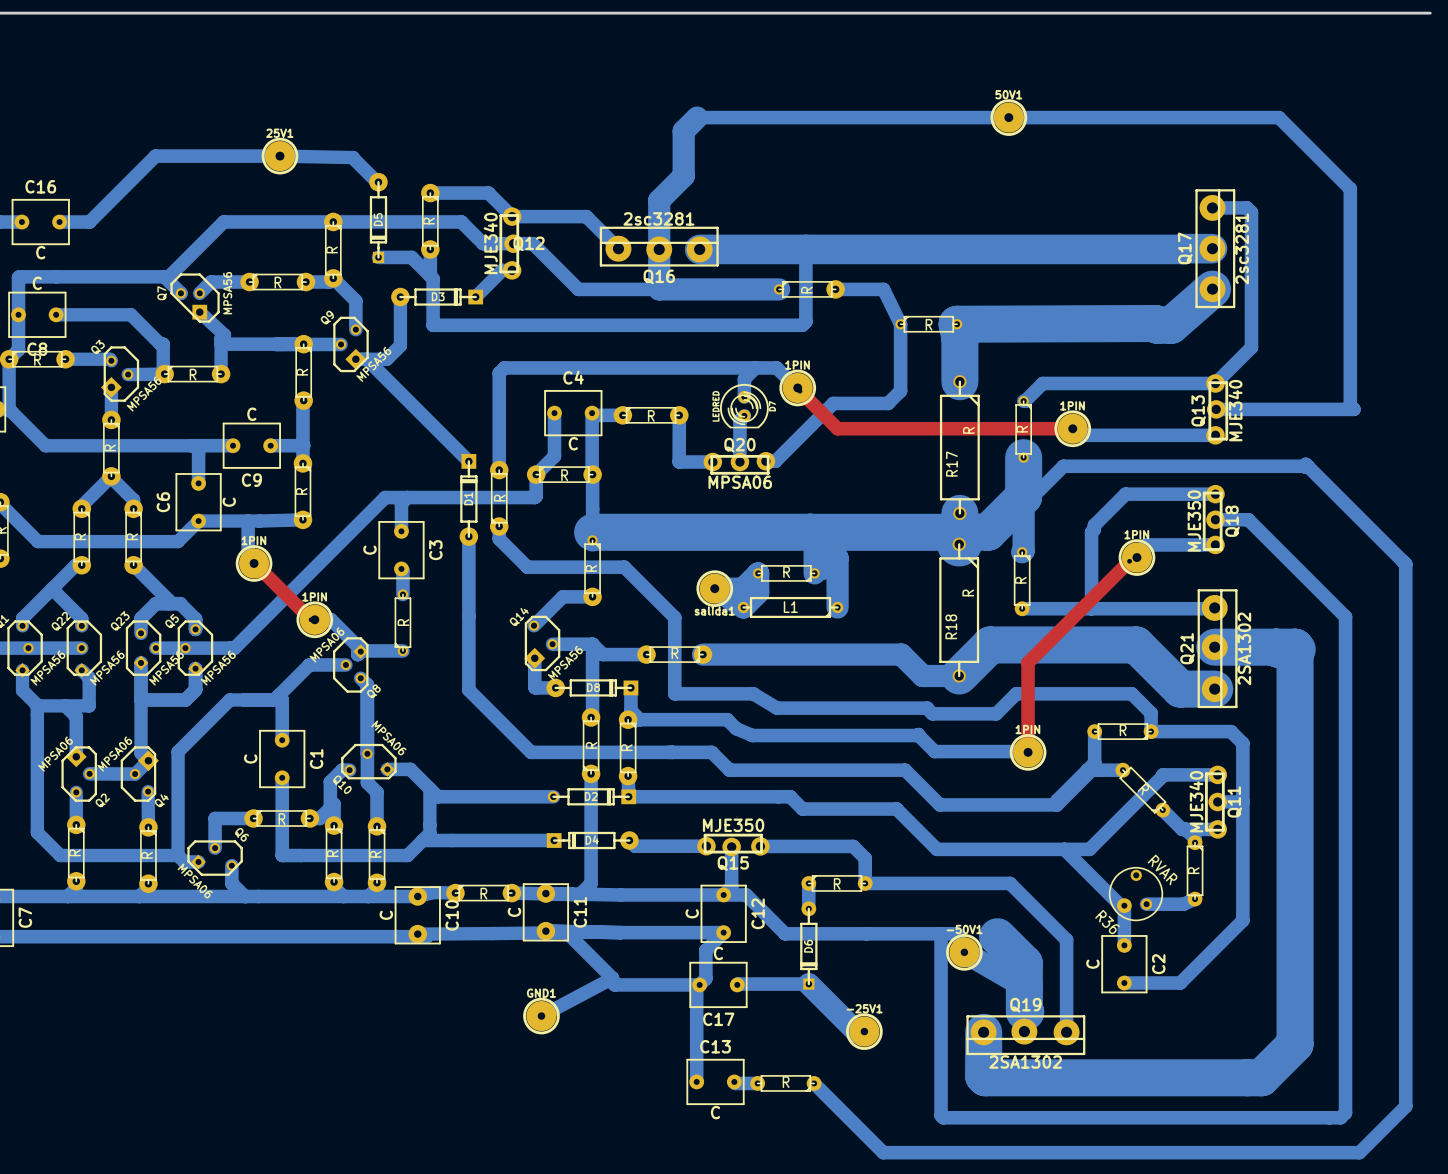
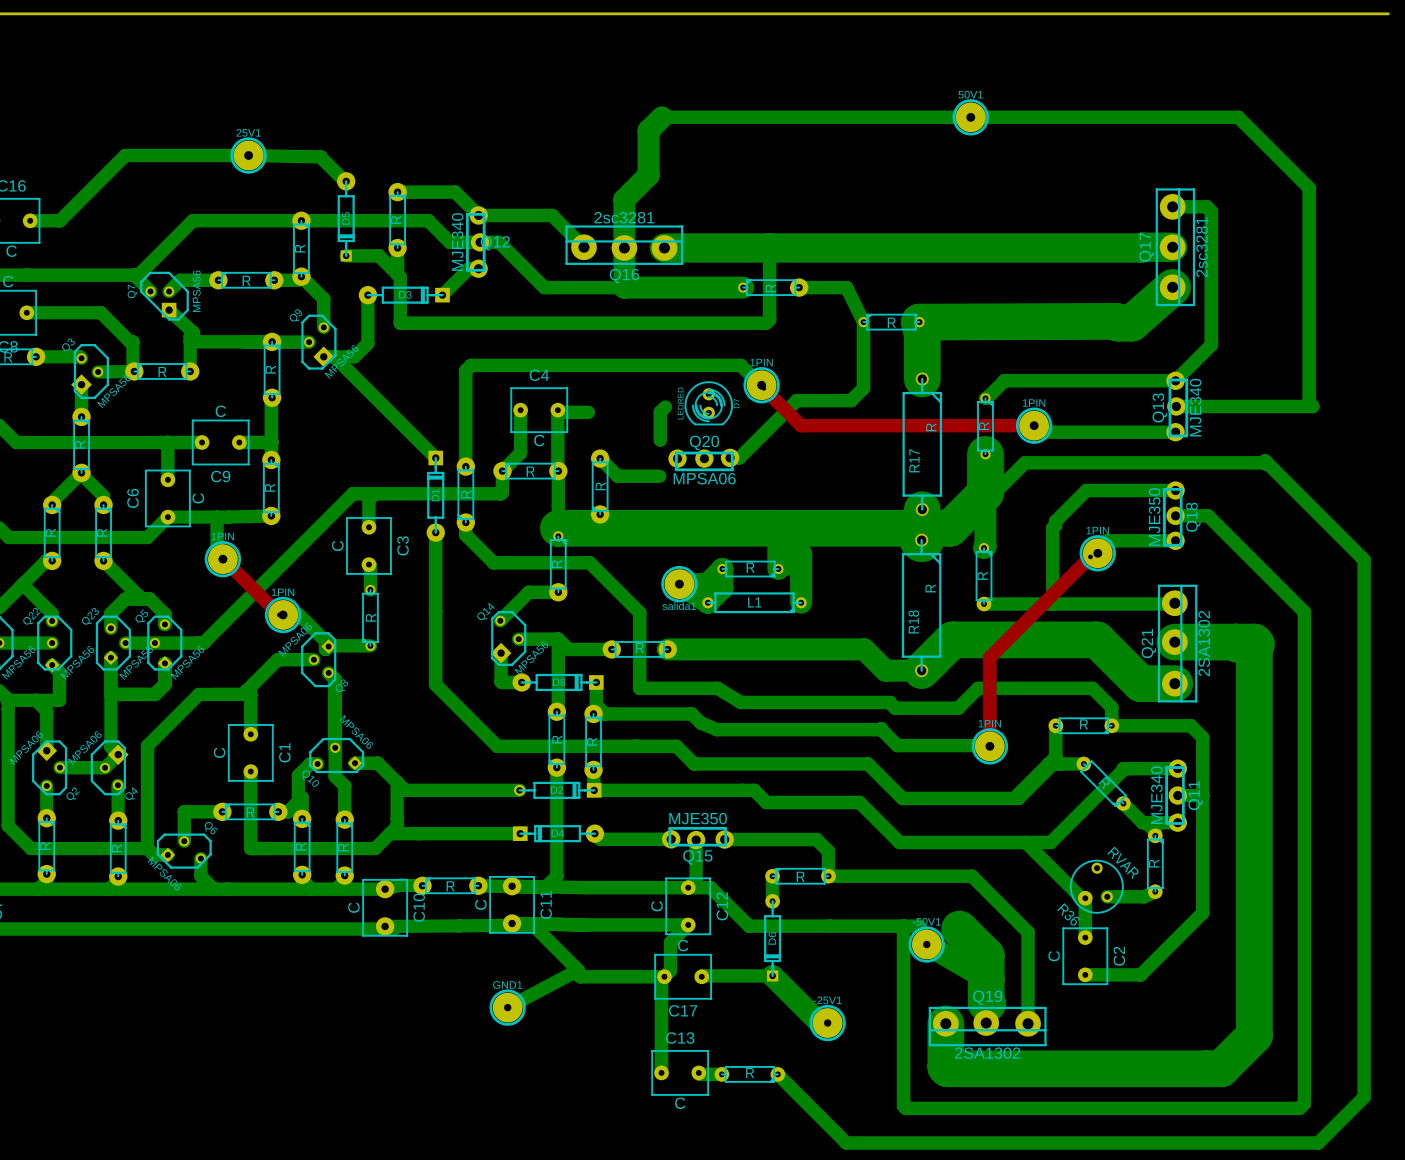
bottom track: (755, 367) (744, 379) (744, 397) -> none
bottom track: none -> (665, 407) (660, 412) (660, 440)
part rotation: 0° (651, 415) -> 90° counterclockwise (600, 486)
part position: (651, 415) -> (600, 486)
bottom track: (679, 415) (679, 462) (712, 462) -> none
bottom track: (744, 415) (739, 420) (739, 462) -> none
bottom track: none -> (600, 458) (617, 476) (659, 476)

